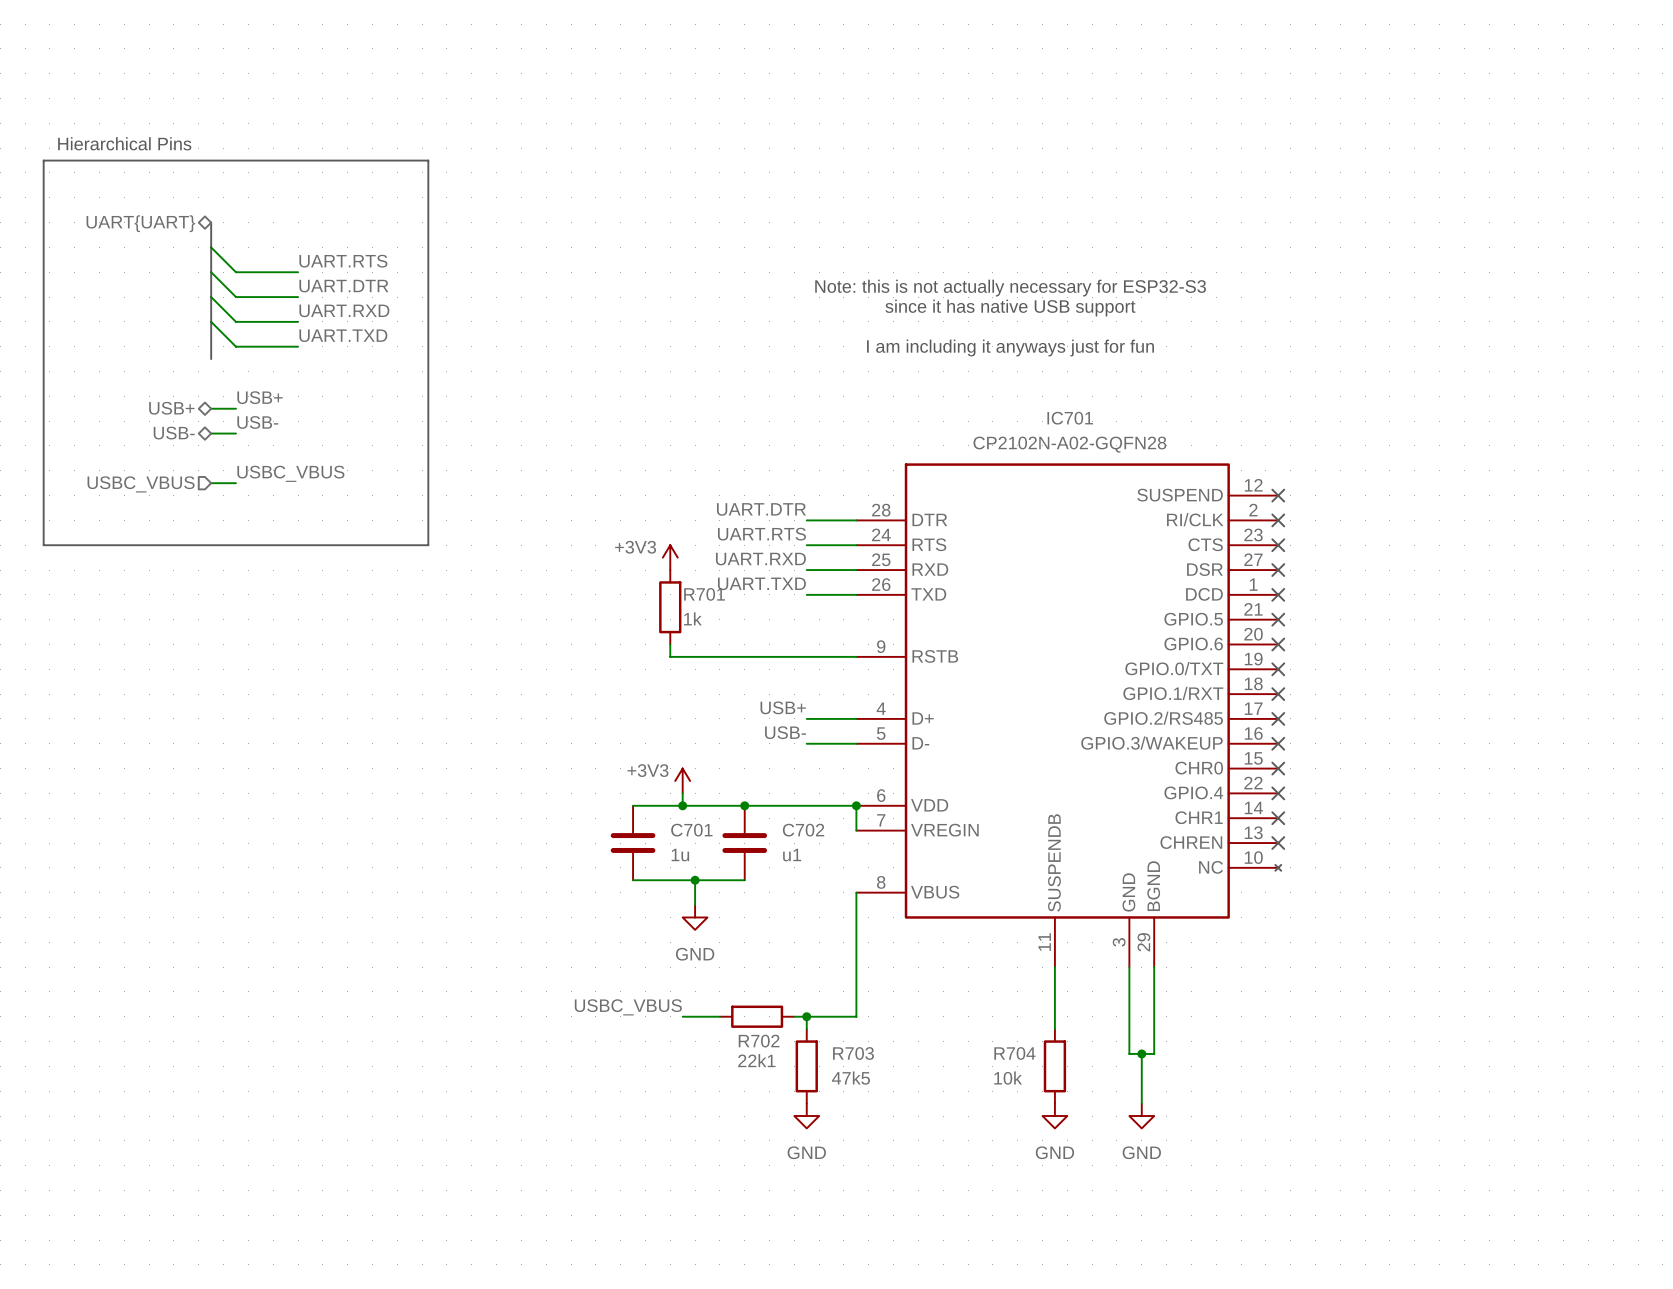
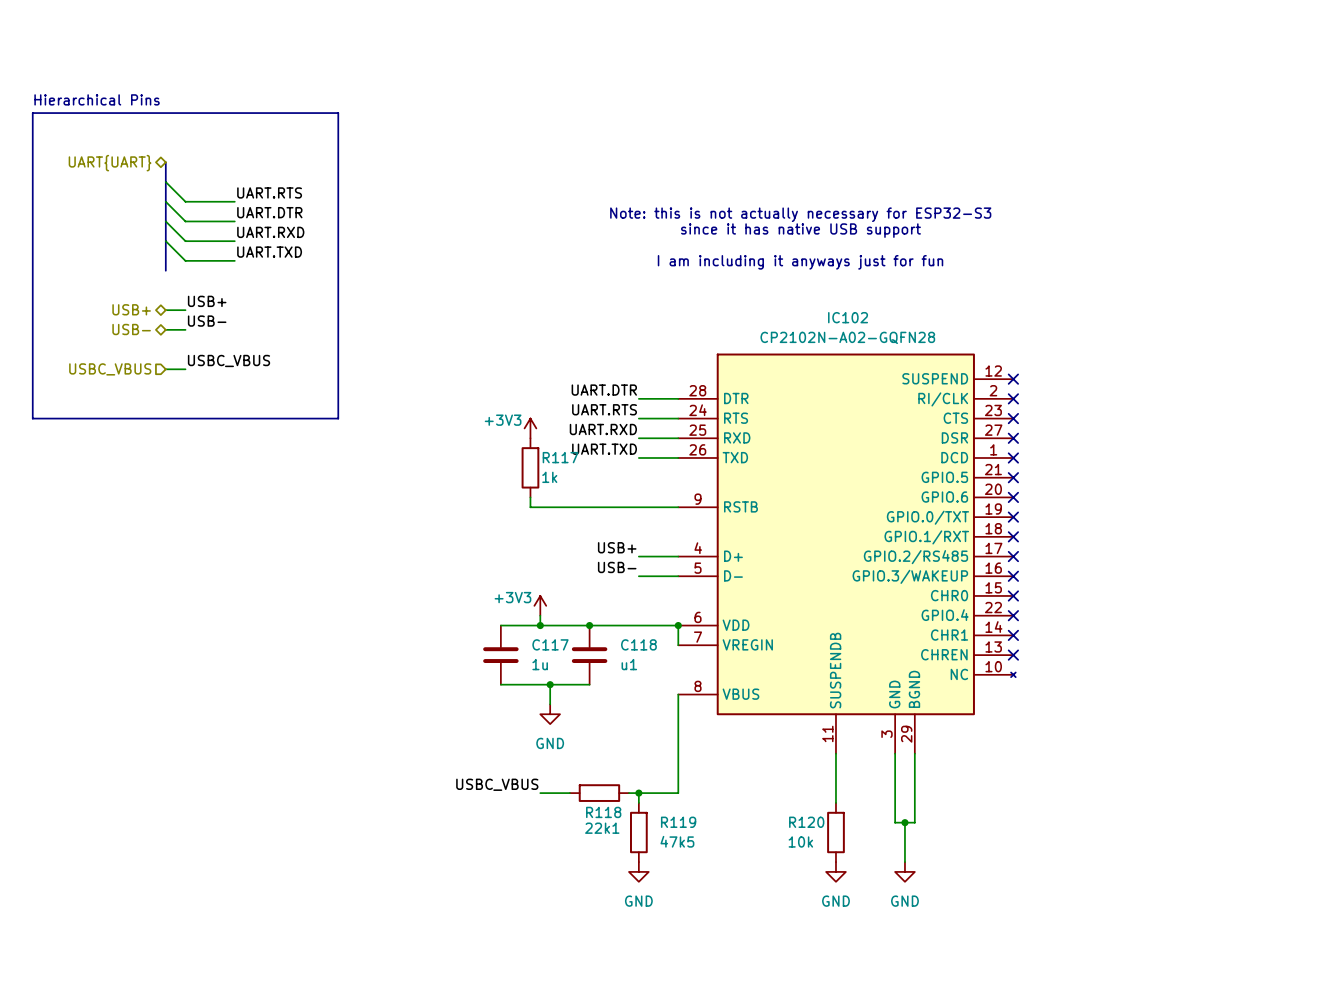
IC701 name: IC701 (1070, 418) -> IC102 (848, 317)
R701 name: R701 (704, 594) -> R117 (560, 457)
C701 name: C701 (691, 830) -> C117 (550, 644)
C702 name: C702 (803, 830) -> C118 (638, 644)
R702 name: R702 (759, 1041) -> R118 (603, 812)
R703 name: R703 (853, 1053) -> R119 (678, 822)
R704 name: R704 (1014, 1053) -> R120 (806, 822)

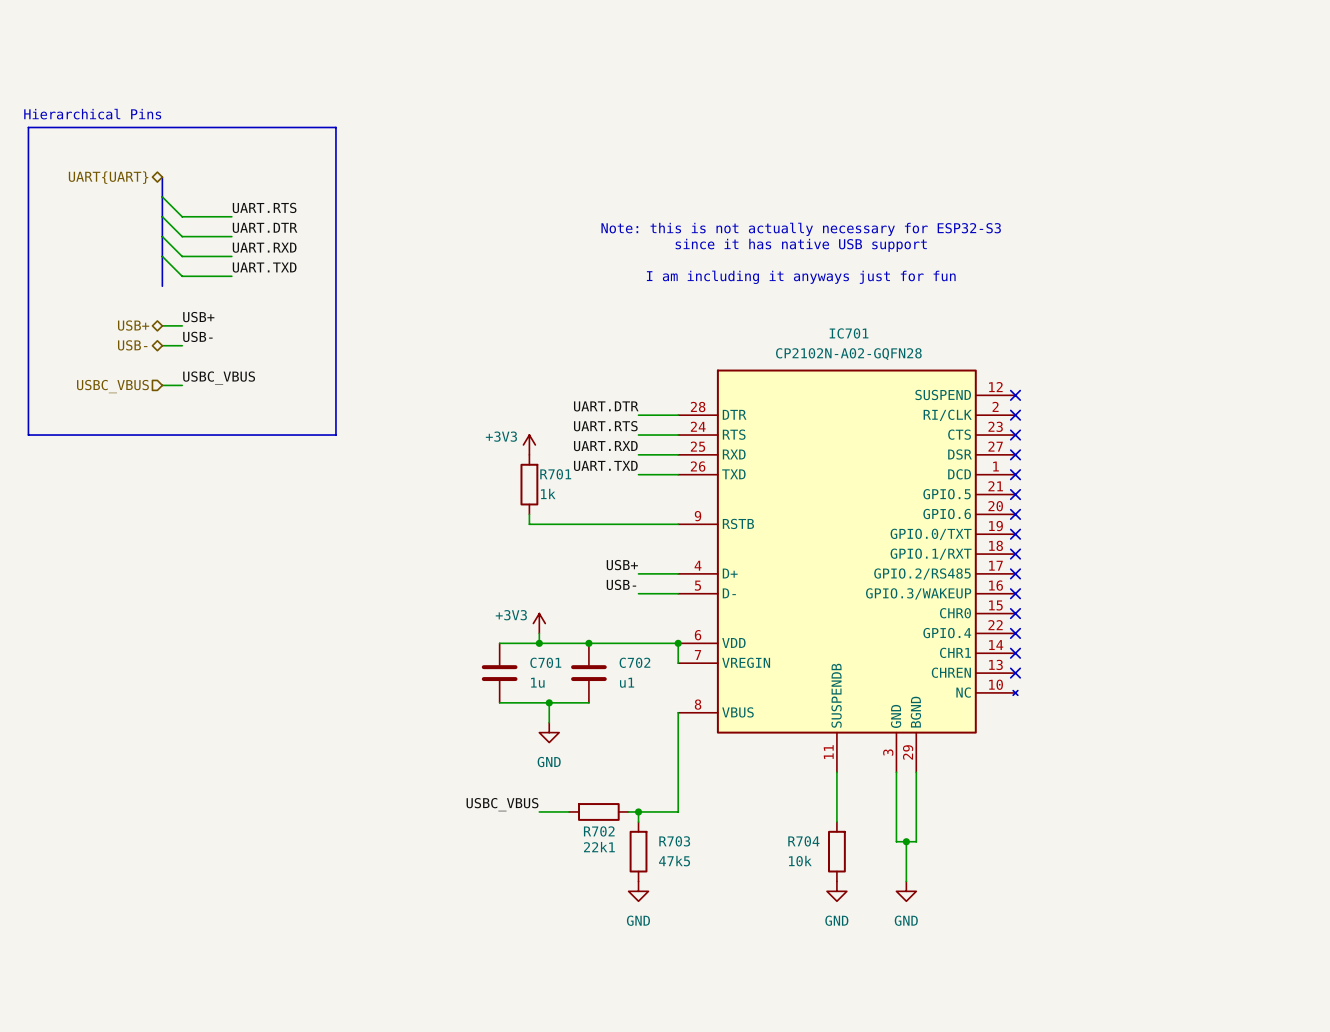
IC102 name: IC102 (848, 317) -> IC701 (849, 333)
R117 name: R117 (560, 457) -> R701 (555, 474)
C117 name: C117 (550, 644) -> C701 (545, 662)
C118 name: C118 (638, 644) -> C702 (634, 662)
R118 name: R118 (603, 812) -> R702 (599, 831)
R119 name: R119 (678, 822) -> R703 (674, 841)
R120 name: R120 (806, 822) -> R704 (803, 841)

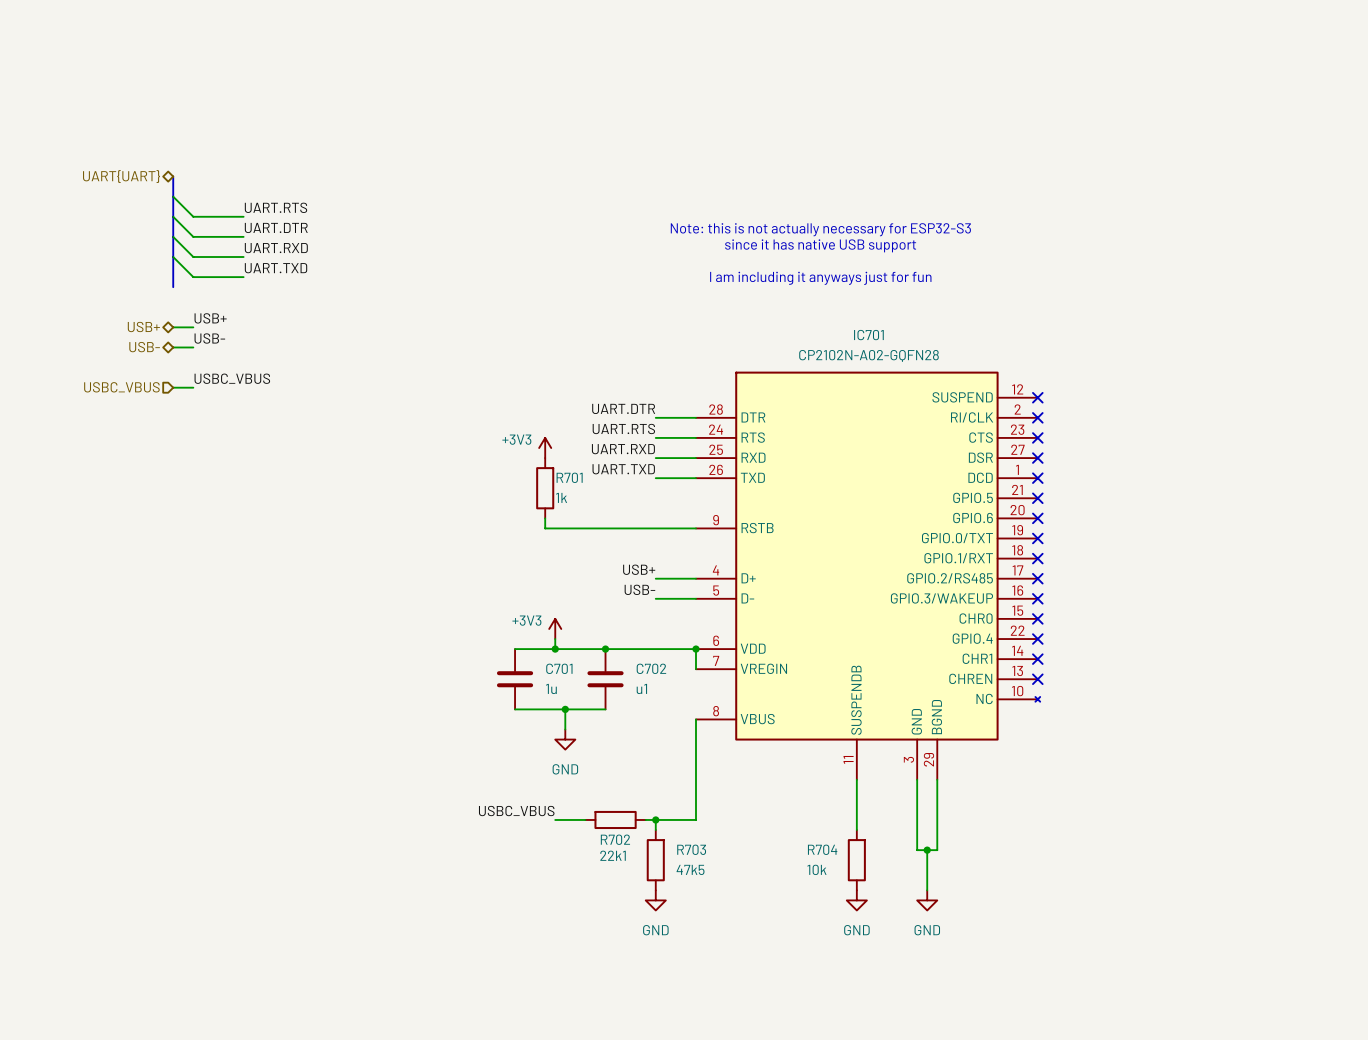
text: Hierarchical Pins (92, 114) -> none
line: (28, 127) (335, 127) (335, 435) (28, 435) (28, 127) -> none

